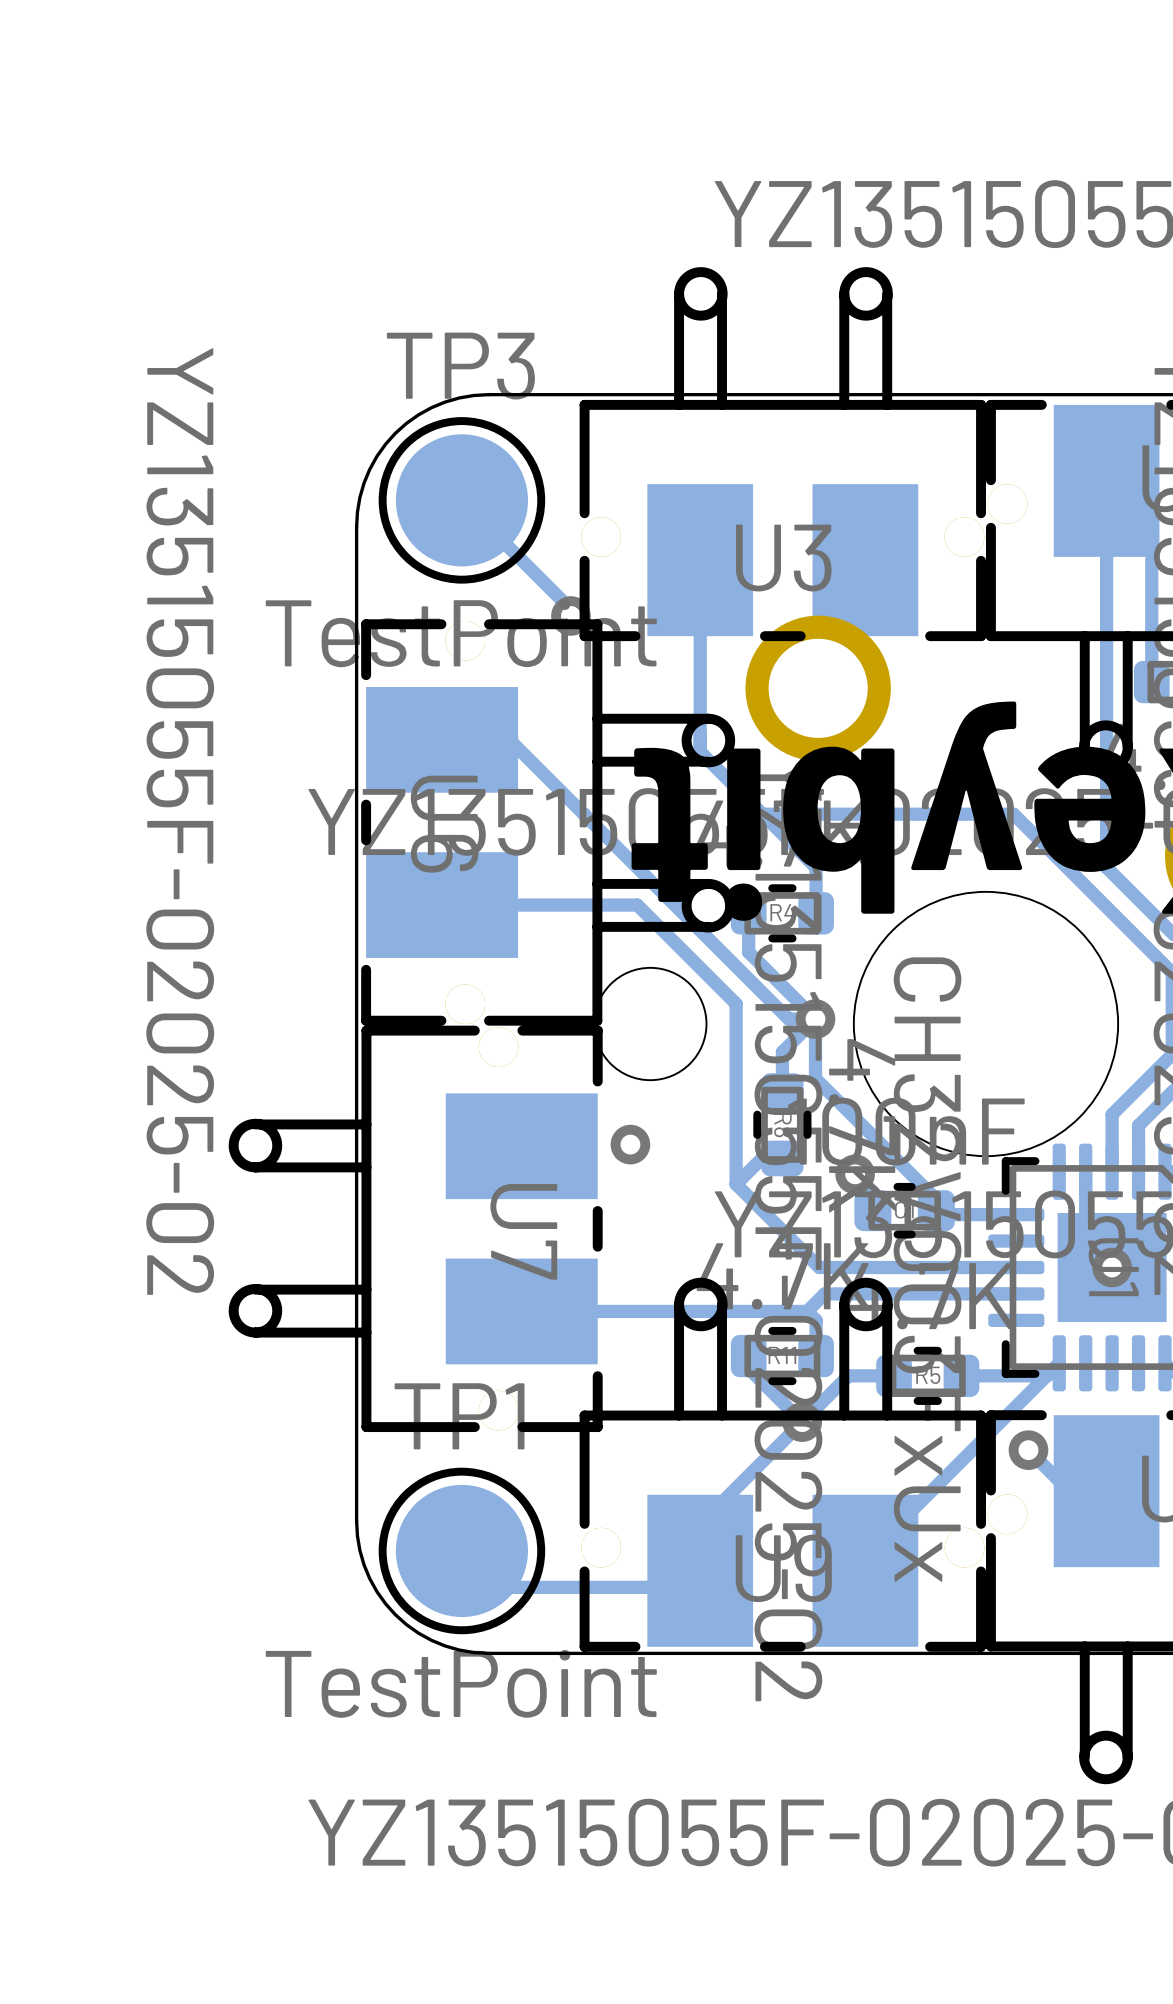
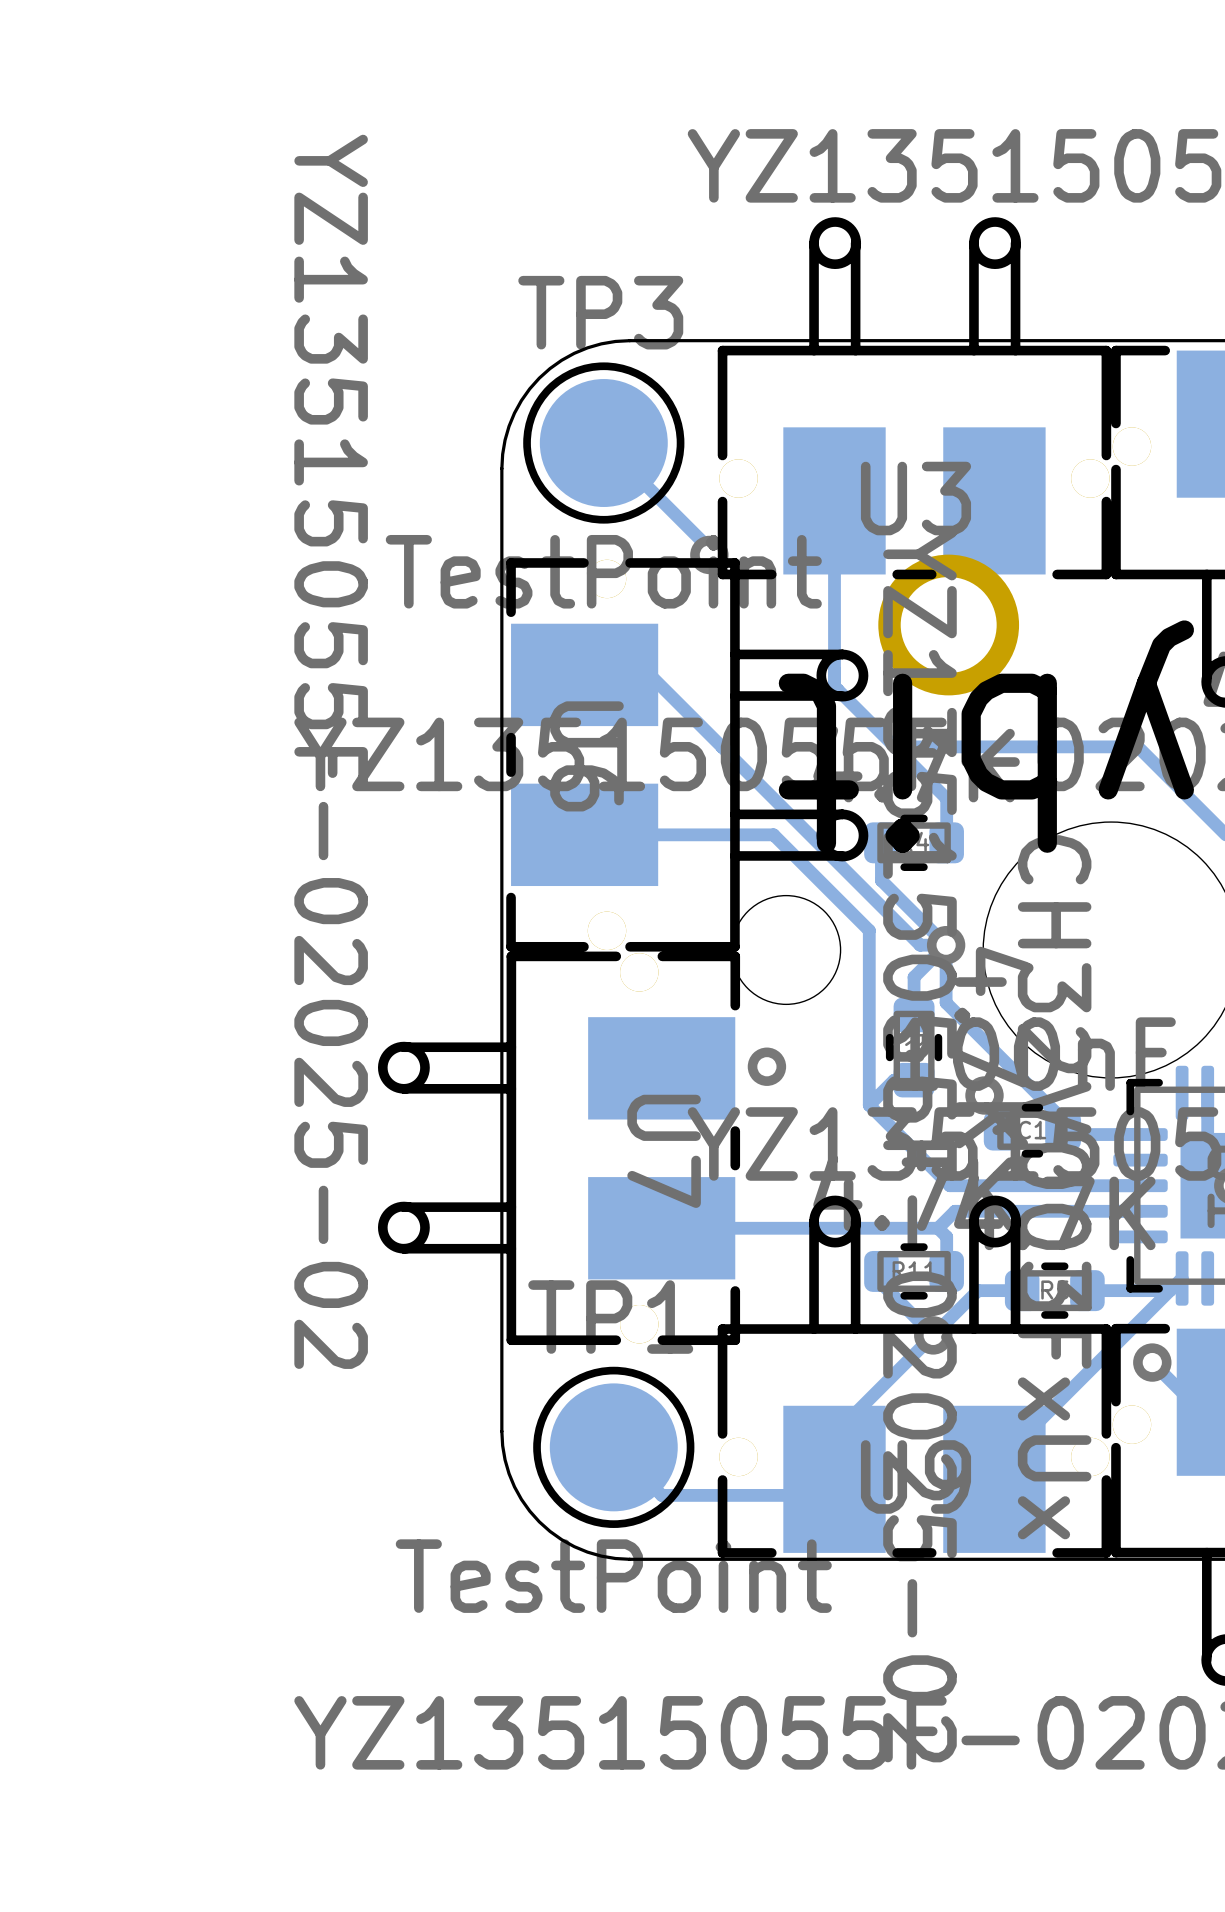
TP1 position: (461, 1550) -> (613, 1447)

